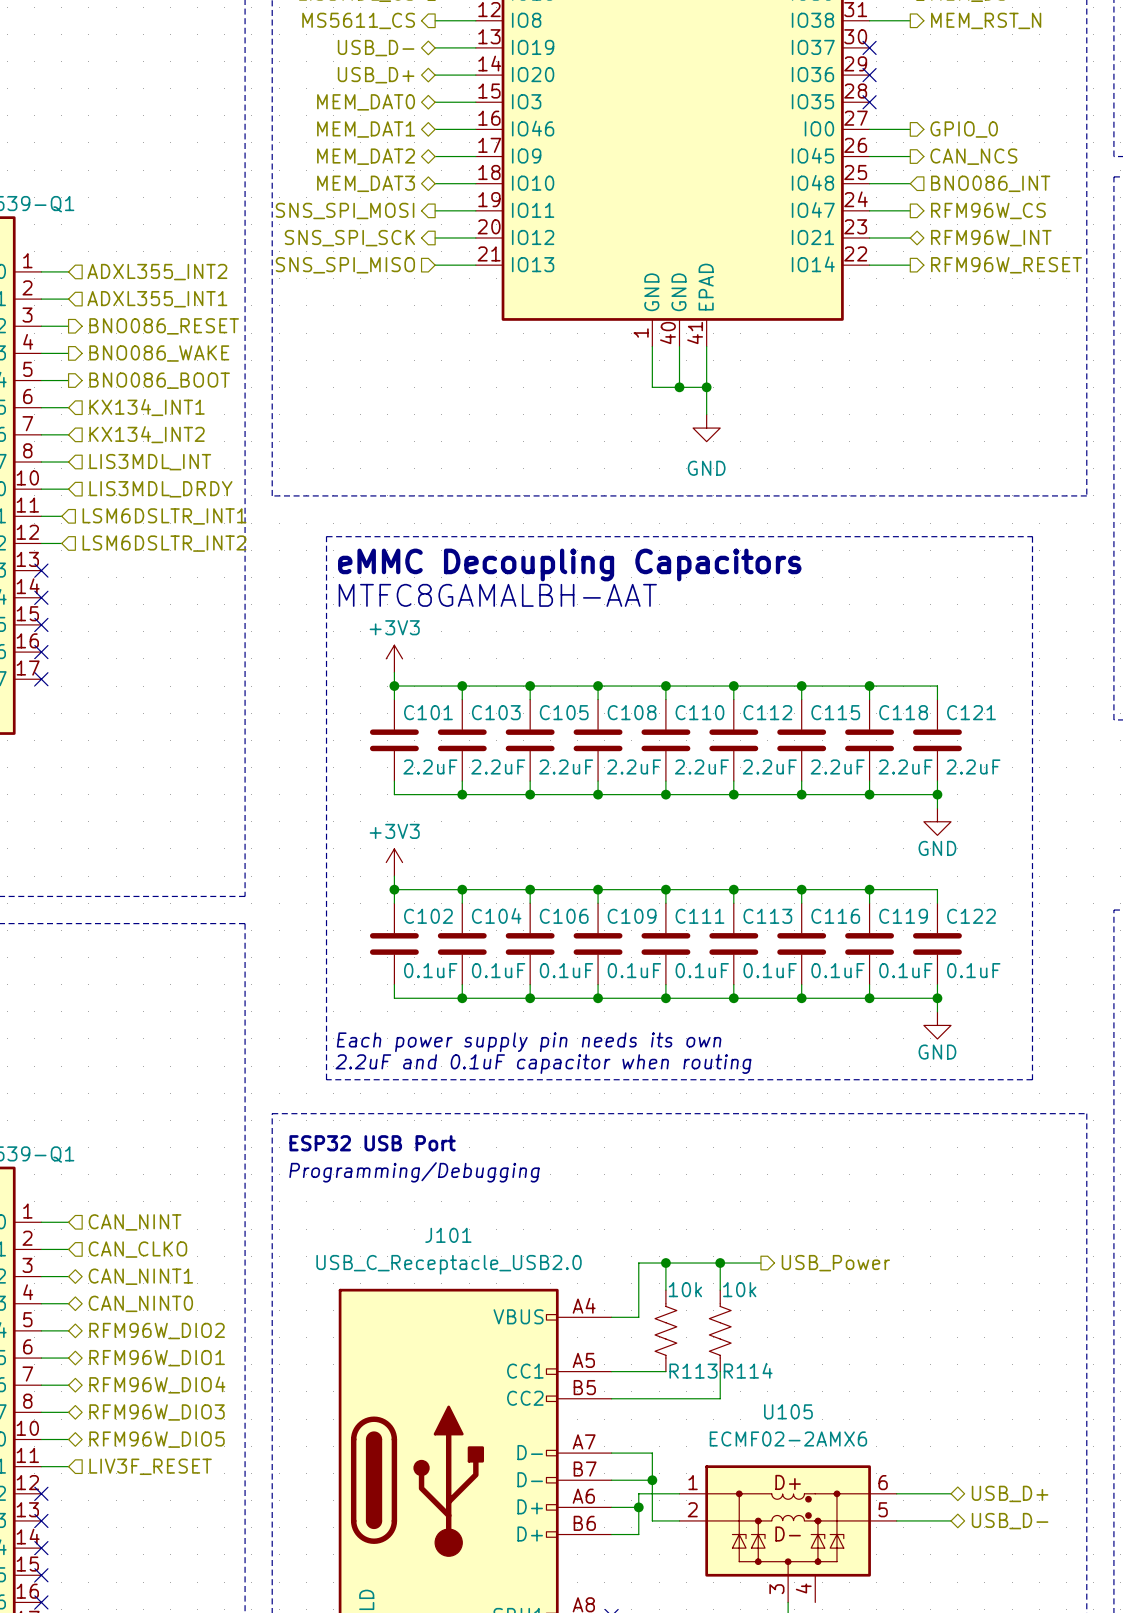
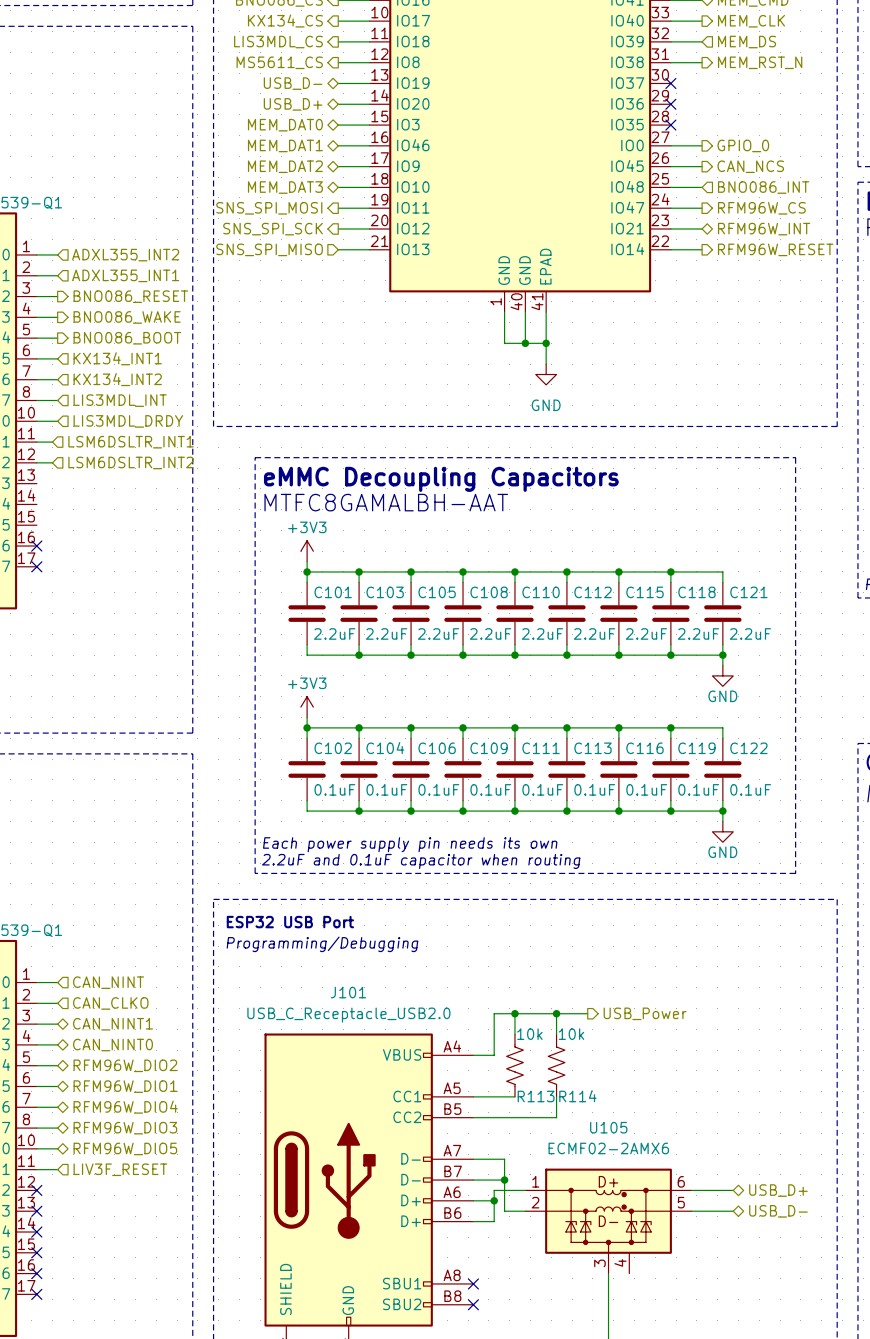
no-connect mark: (41, 570) -> none
no-connect mark: (41, 597) -> none
no-connect mark: (41, 624) -> none

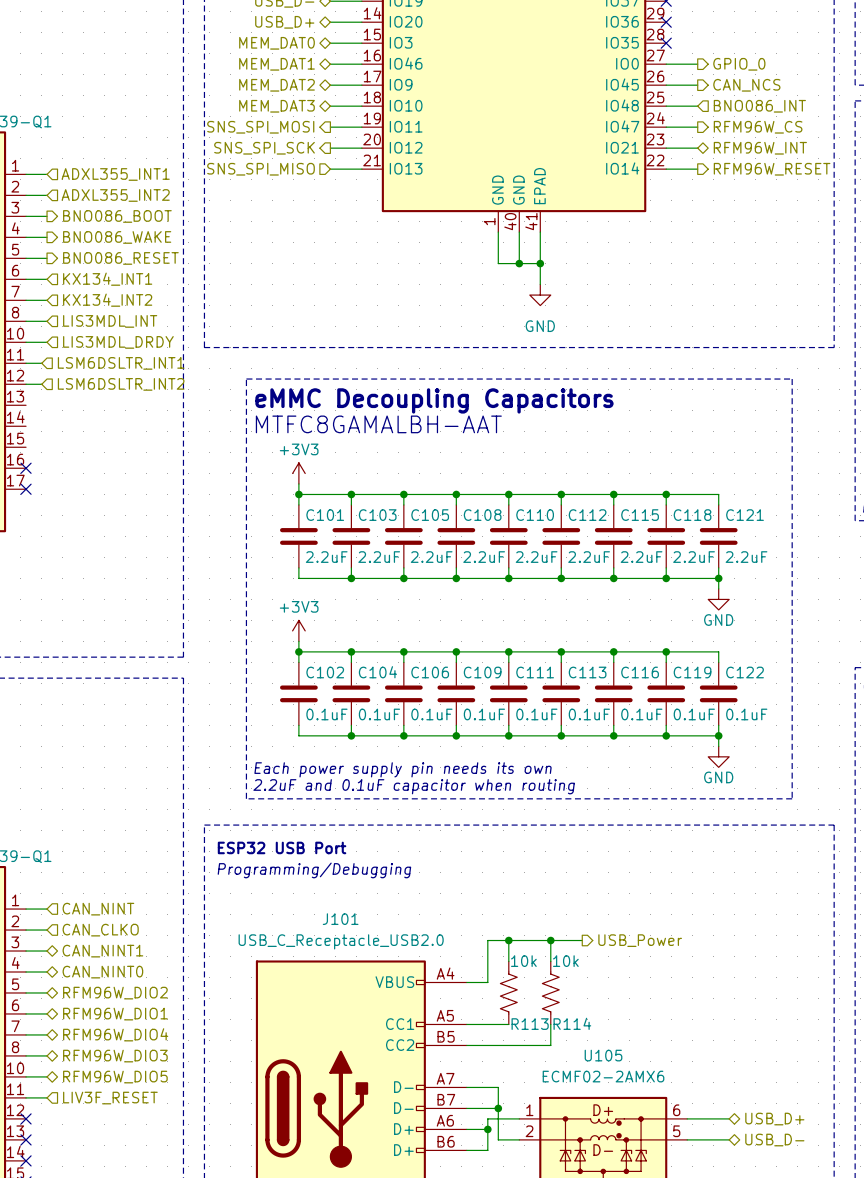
hierarchical label: ADXL355_INT2 (125, 255) -> ADXL355_INT1 (115, 174)
hierarchical label: ADXL355_INT1 (125, 275) -> ADXL355_INT2 (115, 195)
hierarchical label: BNO086_RESET (130, 296) -> BNO086_BOOT (117, 216)
hierarchical label: BNO086_BOOT (127, 338) -> BNO086_RESET (120, 258)

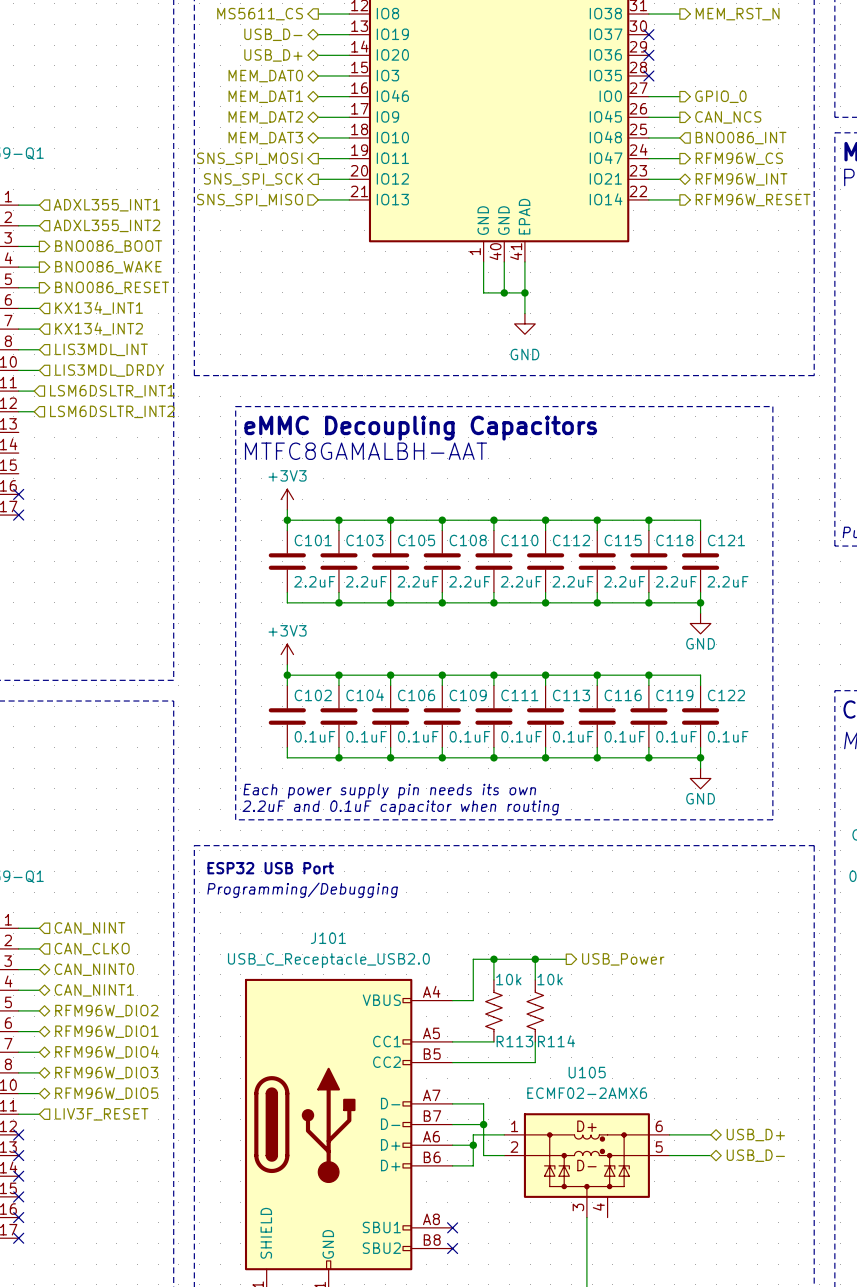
hierarchical label: CAN_NINT1 (102, 951) -> CAN_NINT0 (94, 969)
hierarchical label: CAN_NINT0 (102, 972) -> CAN_NINT1 (94, 990)

